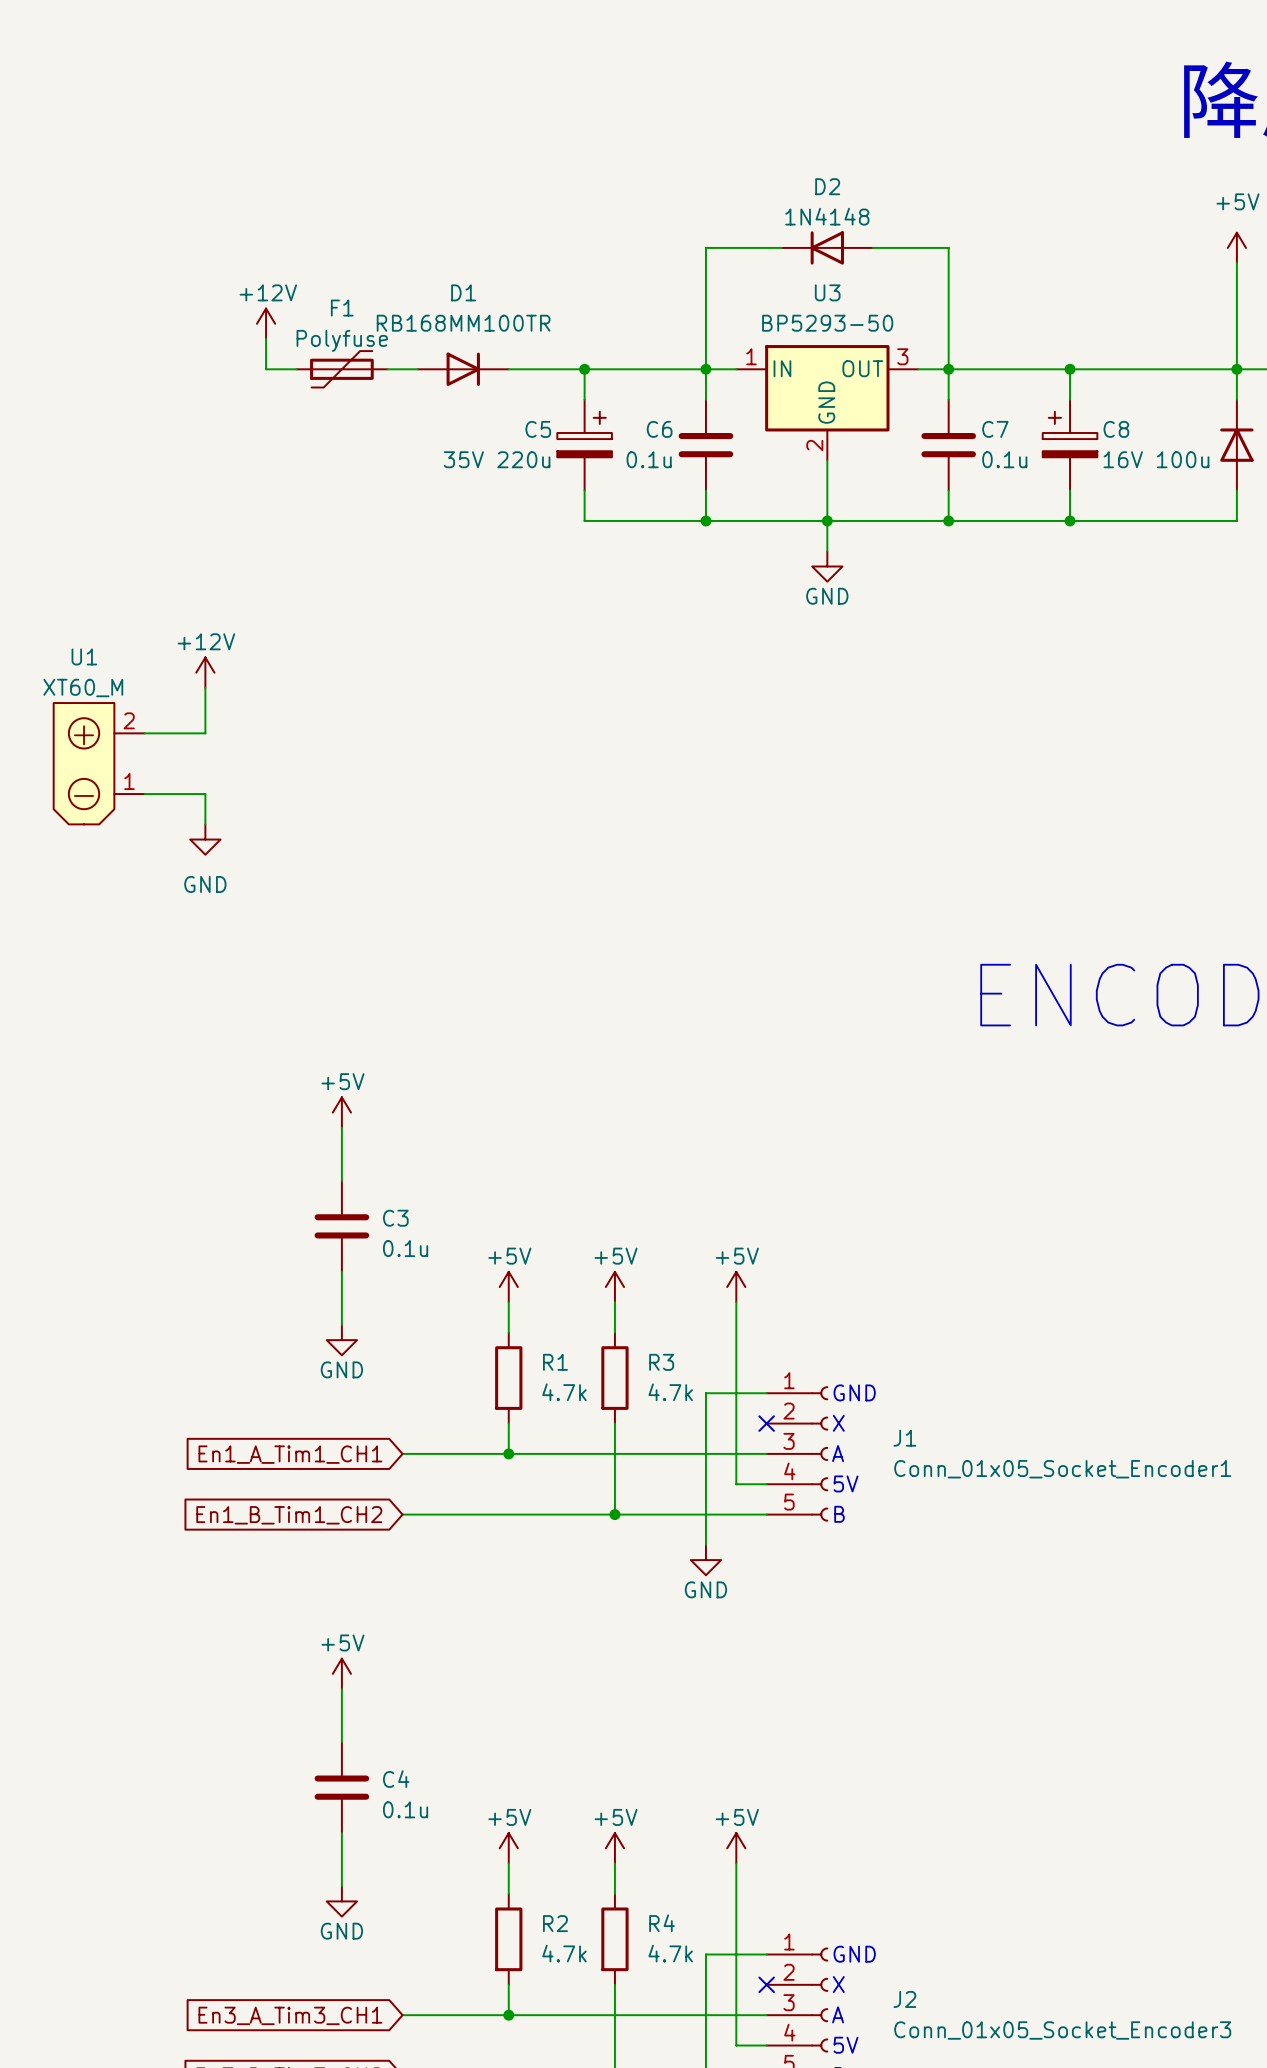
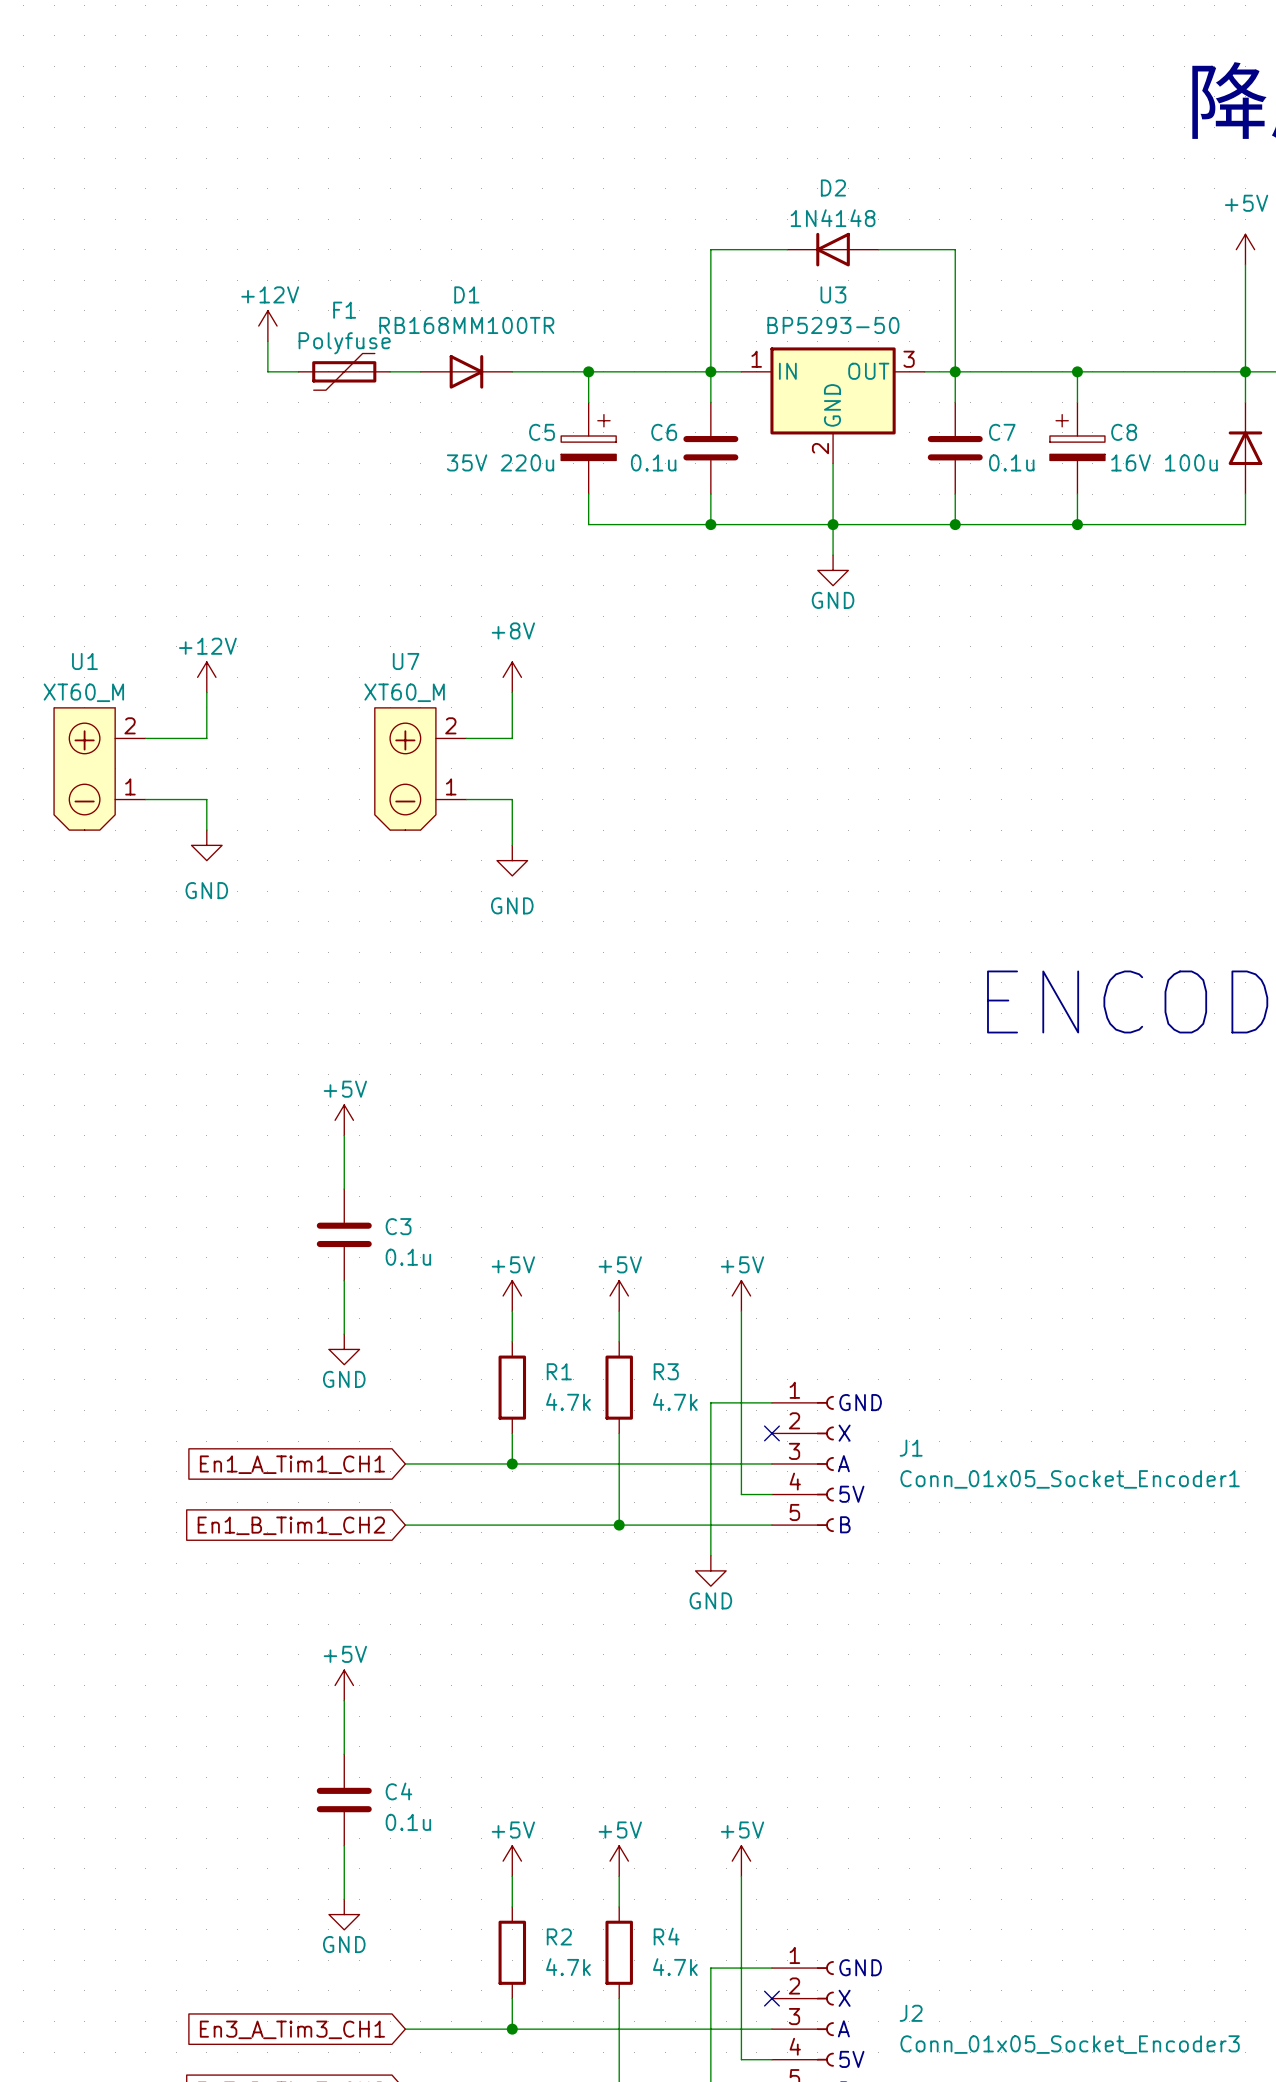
power symbol: none -> +8V (512, 677)
wire: none -> (512, 692) (512, 738) (466, 738)
U7: none -> XT60_M (420, 768)
wire: none -> (466, 799) (512, 799) (512, 845)
power symbol: none -> GND (512, 860)

